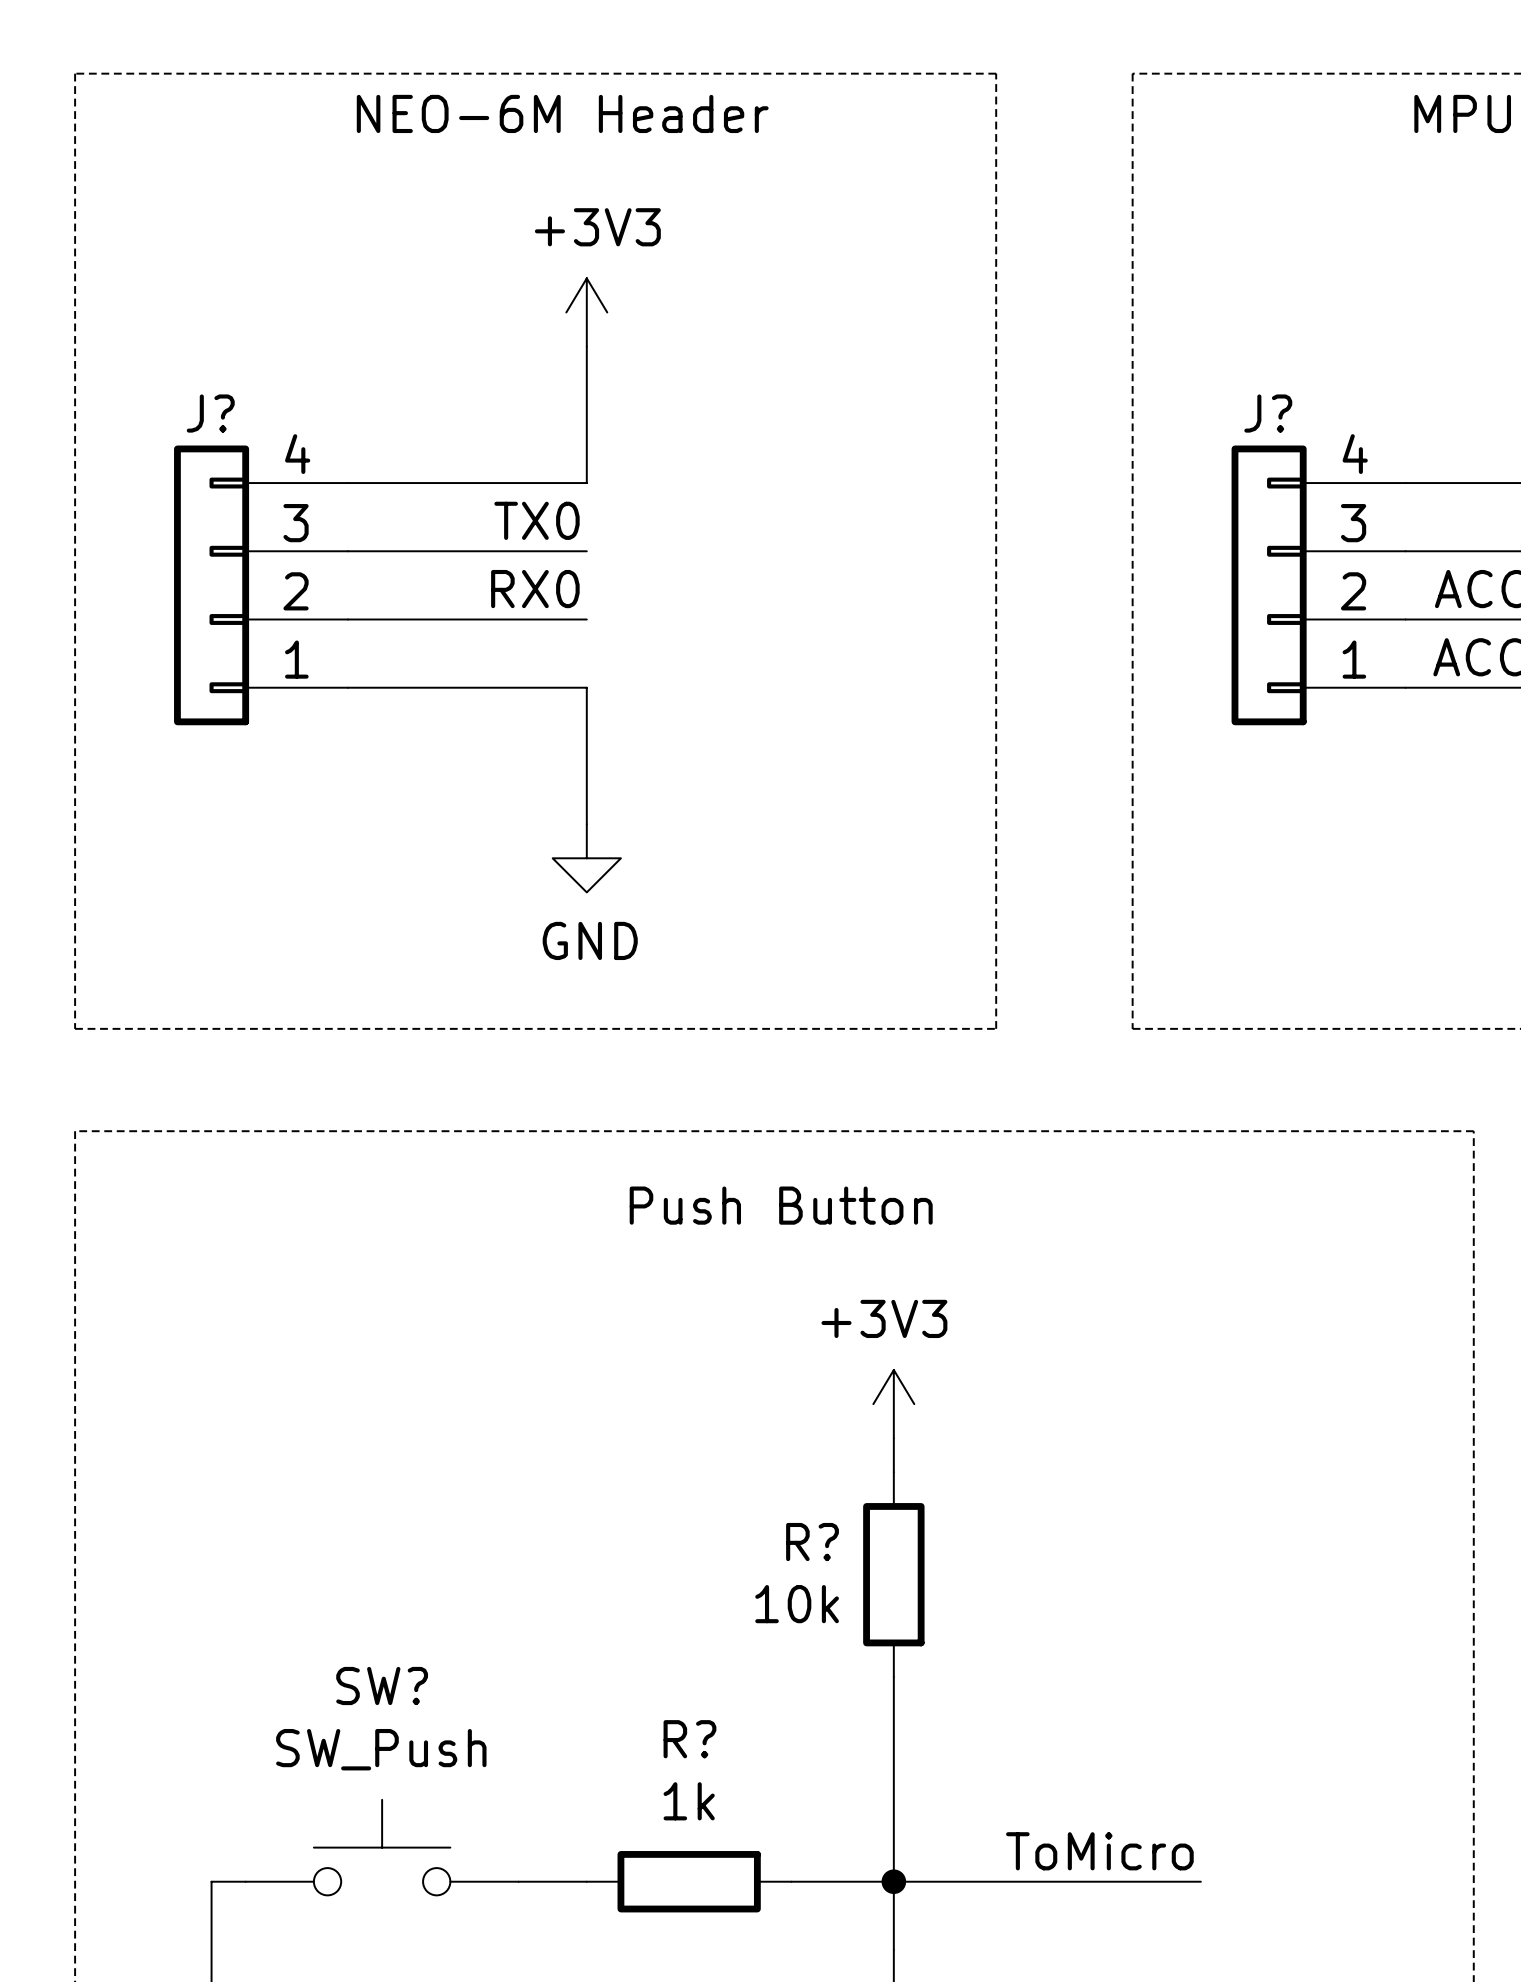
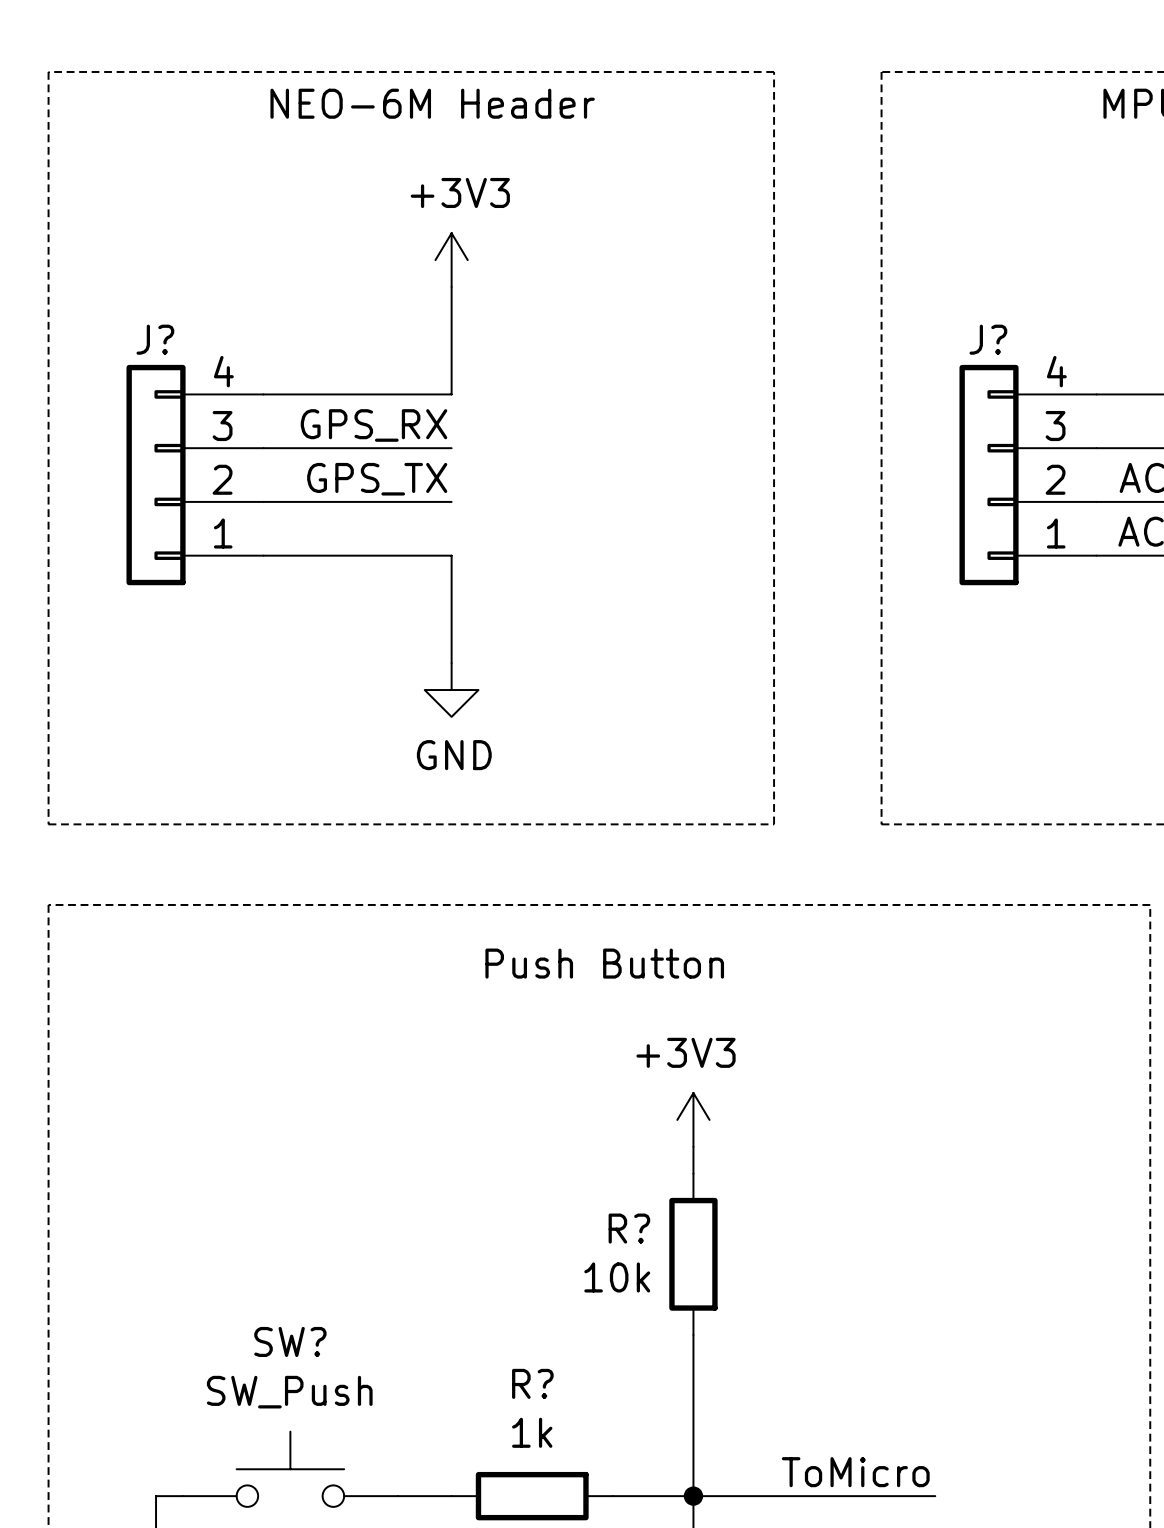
label: TX0 (537, 520) -> GPS_RX (374, 425)
label: RX0 (535, 589) -> GPS_TX (377, 479)

